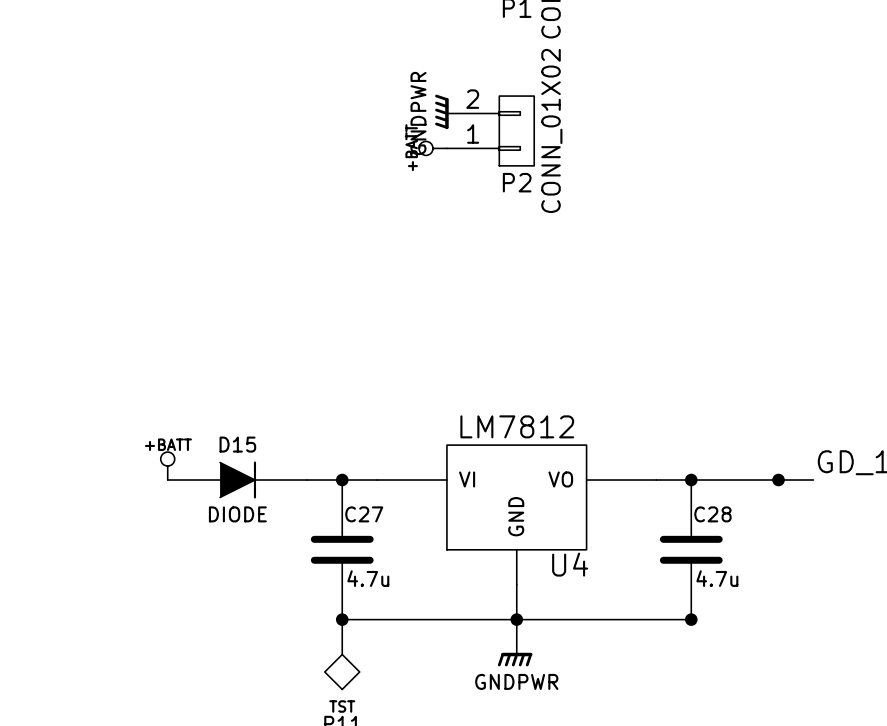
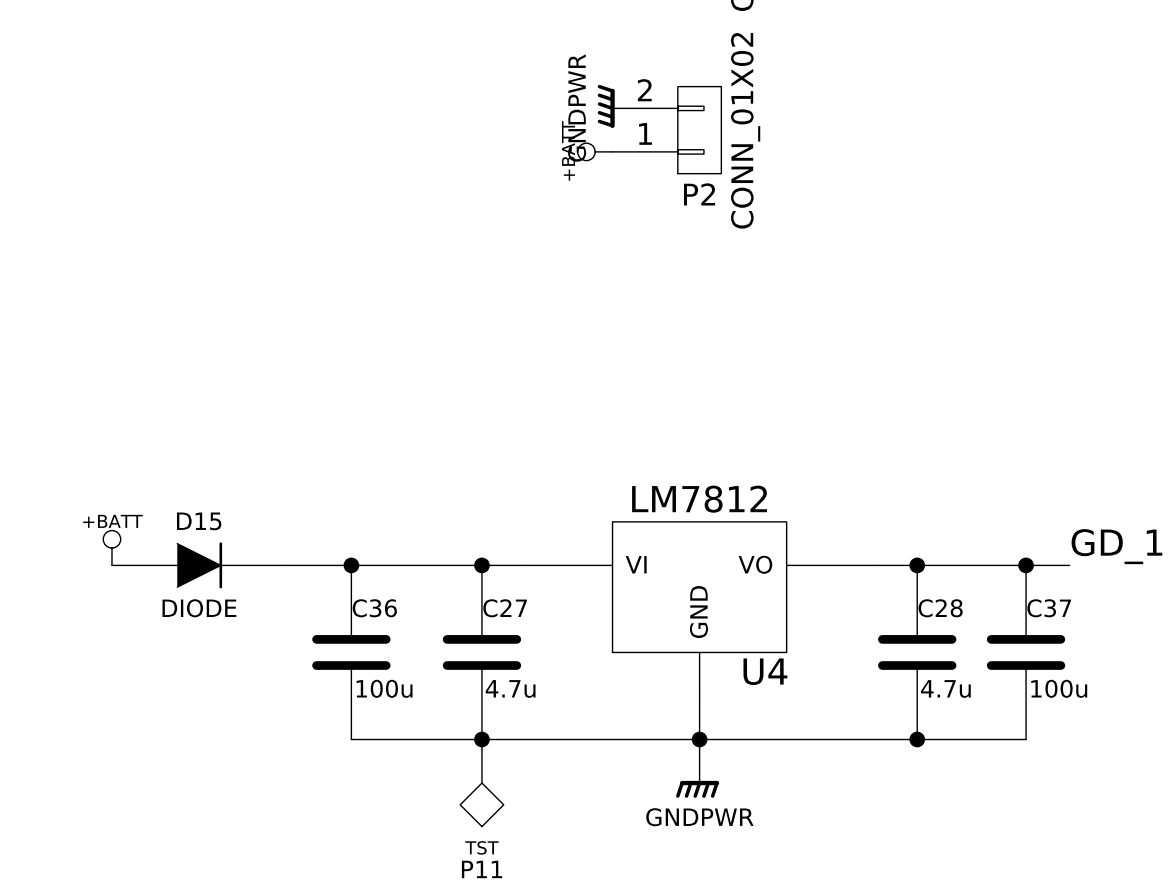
power symbol position: +BATT (167, 466) -> +BATT (111, 547)
D15 position: (237, 480) -> (199, 565)
junction: none -> (351, 565)
C36: none -> 100u (351, 652)
C37: none -> 100u (1026, 652)
wire: none -> (351, 739) (481, 739)
wire: none -> (917, 739) (1026, 739)

